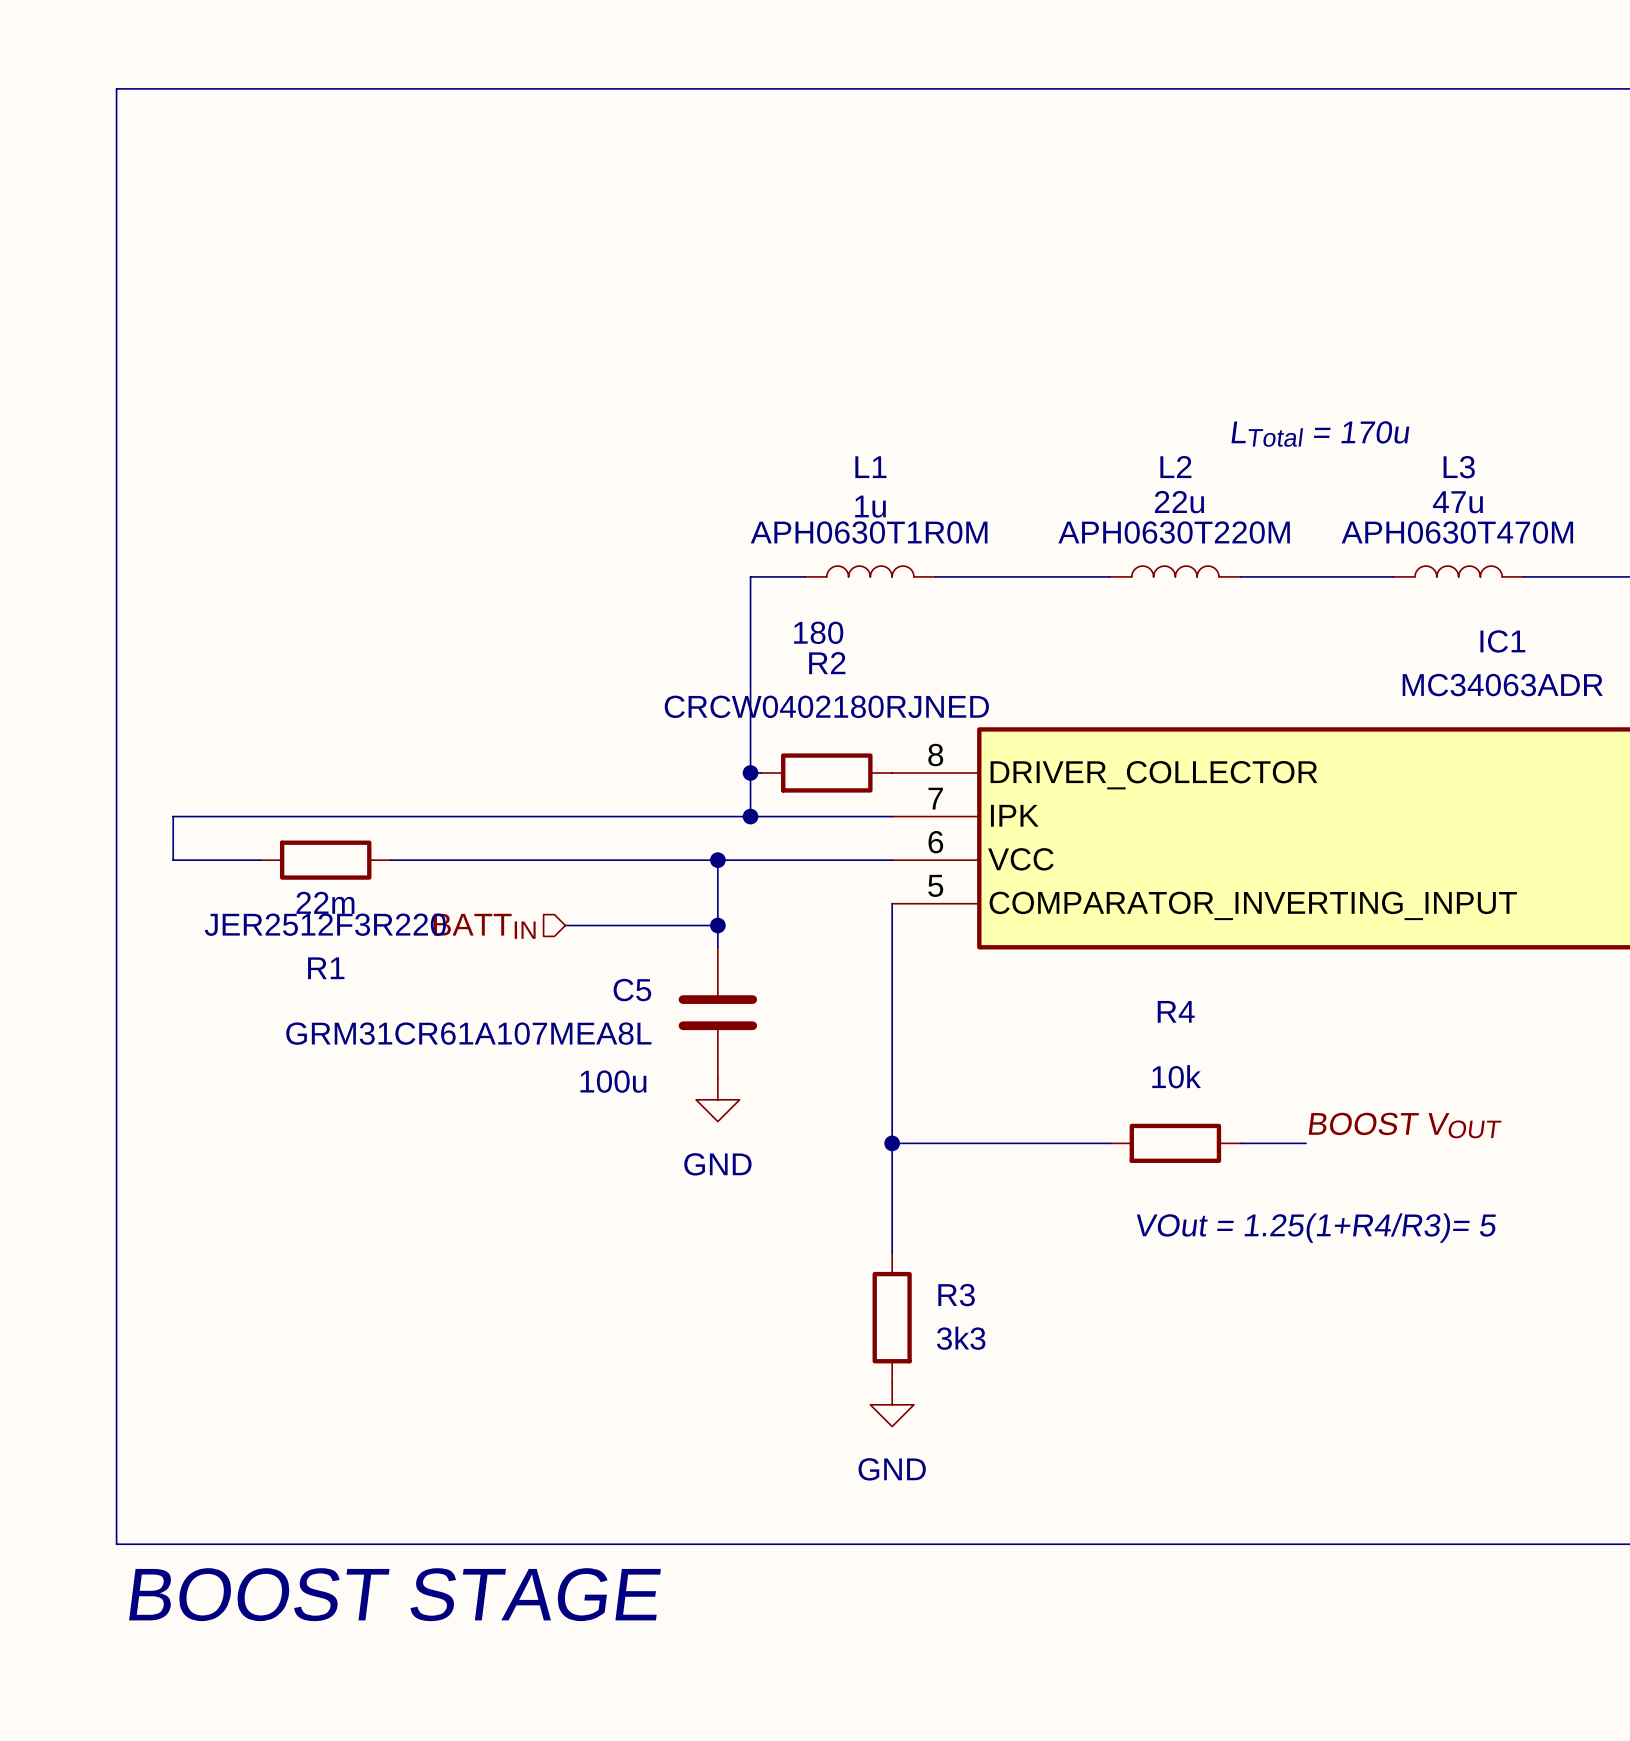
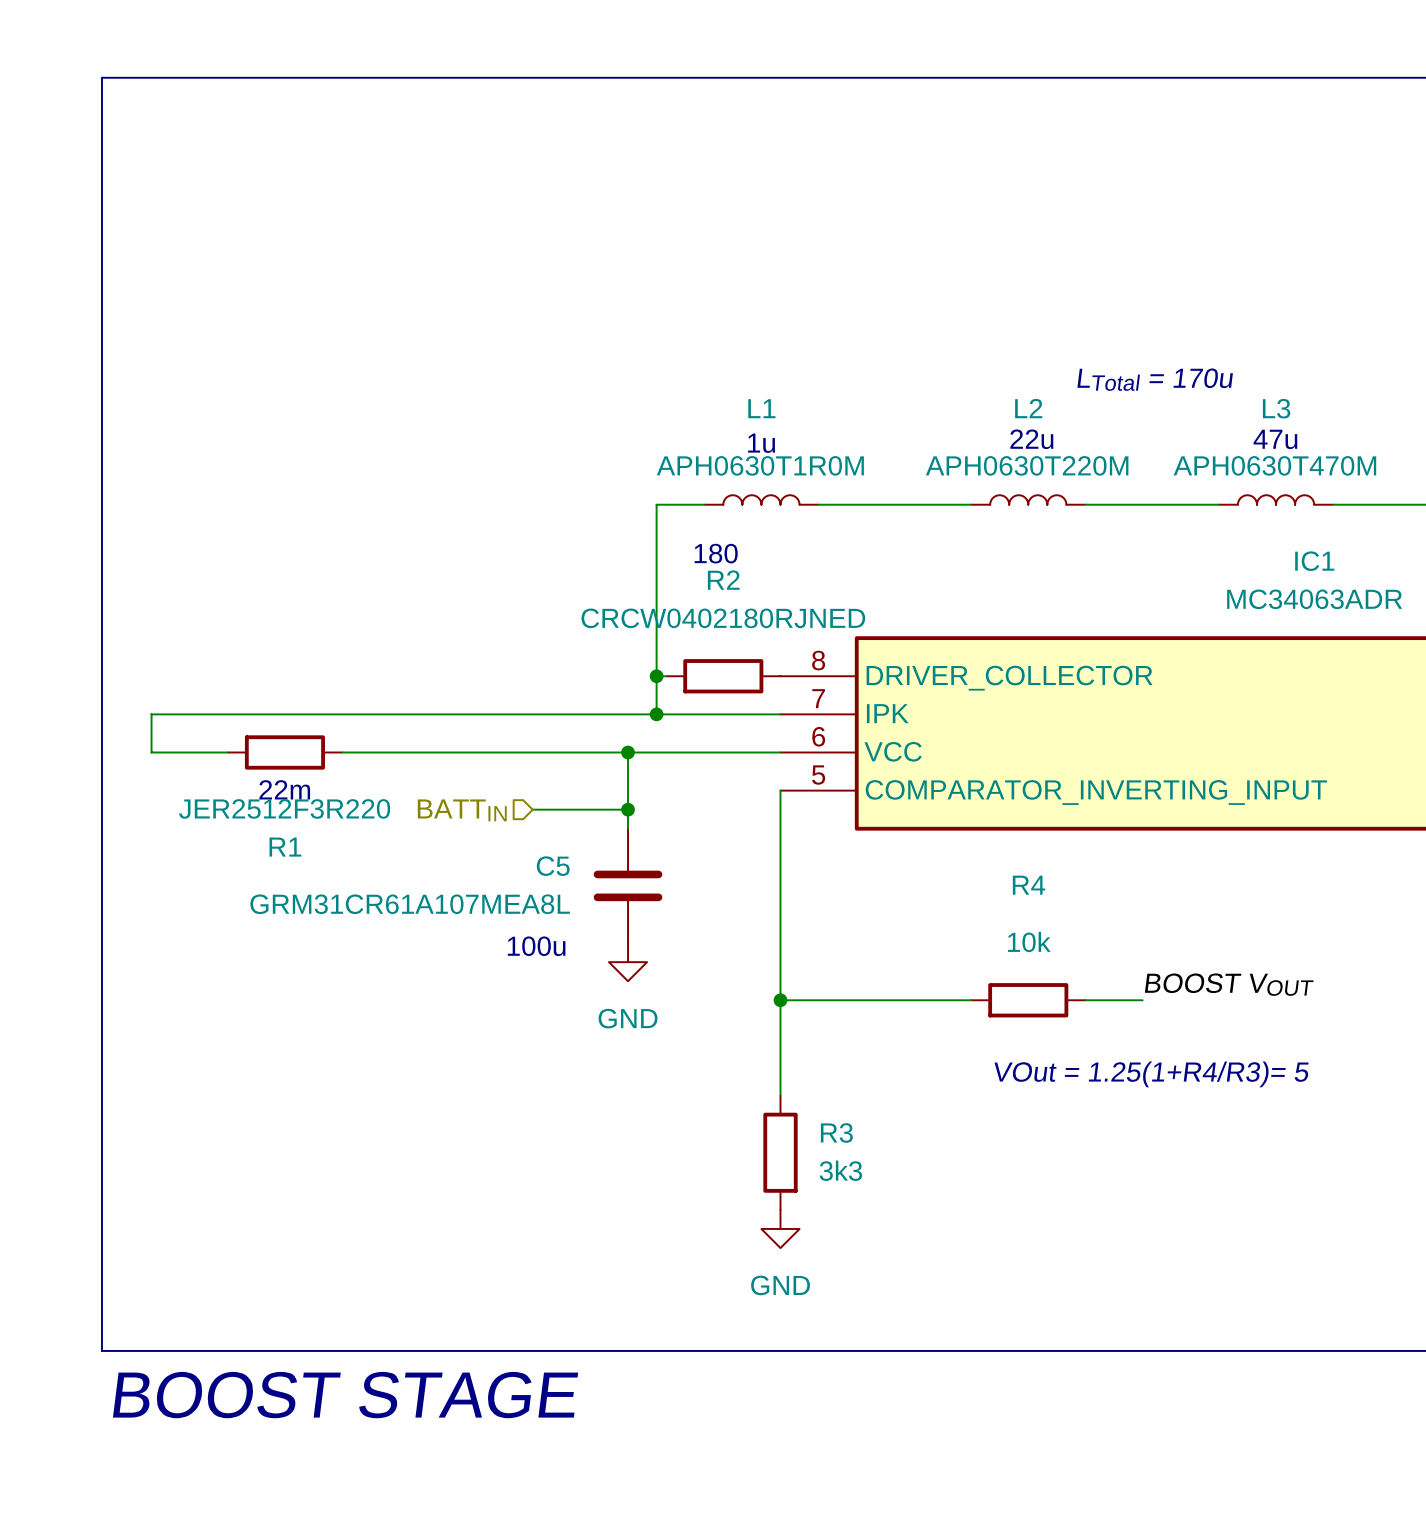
wire: (565, 925) (608, 925) -> none
hierarchical label position: BATTIN (484, 926) -> BATTIN (462, 810)

